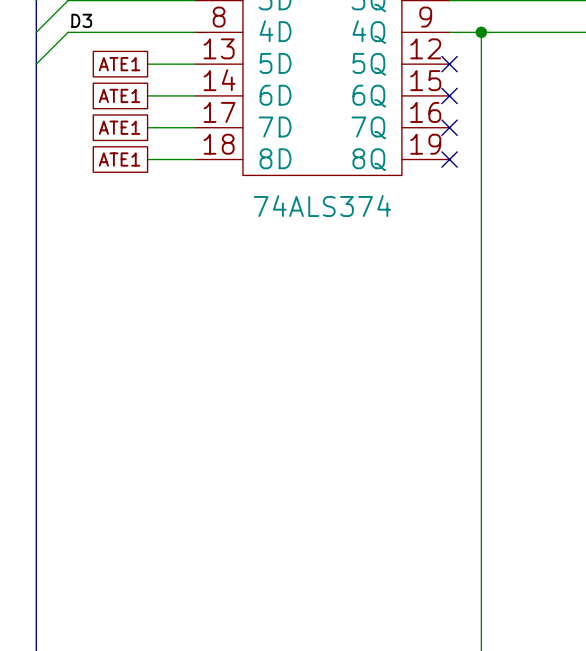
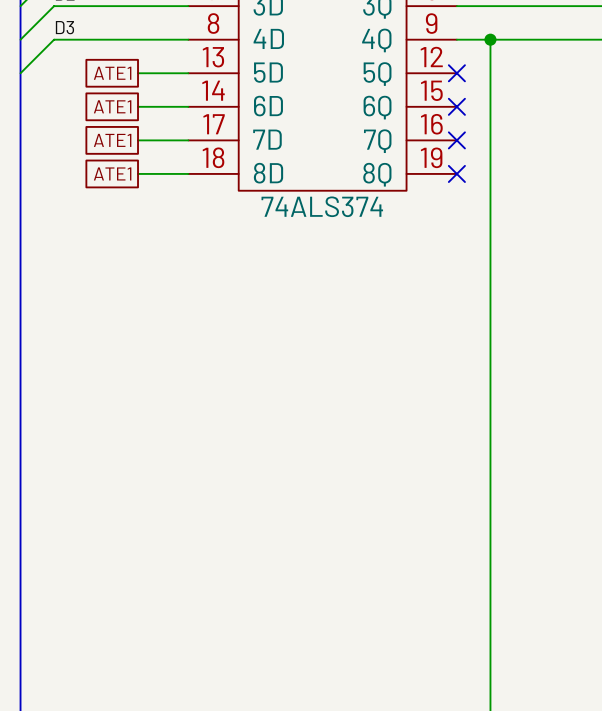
part value position: 74ALS374 (322, 206) -> 74ALS374 (322, 206)

